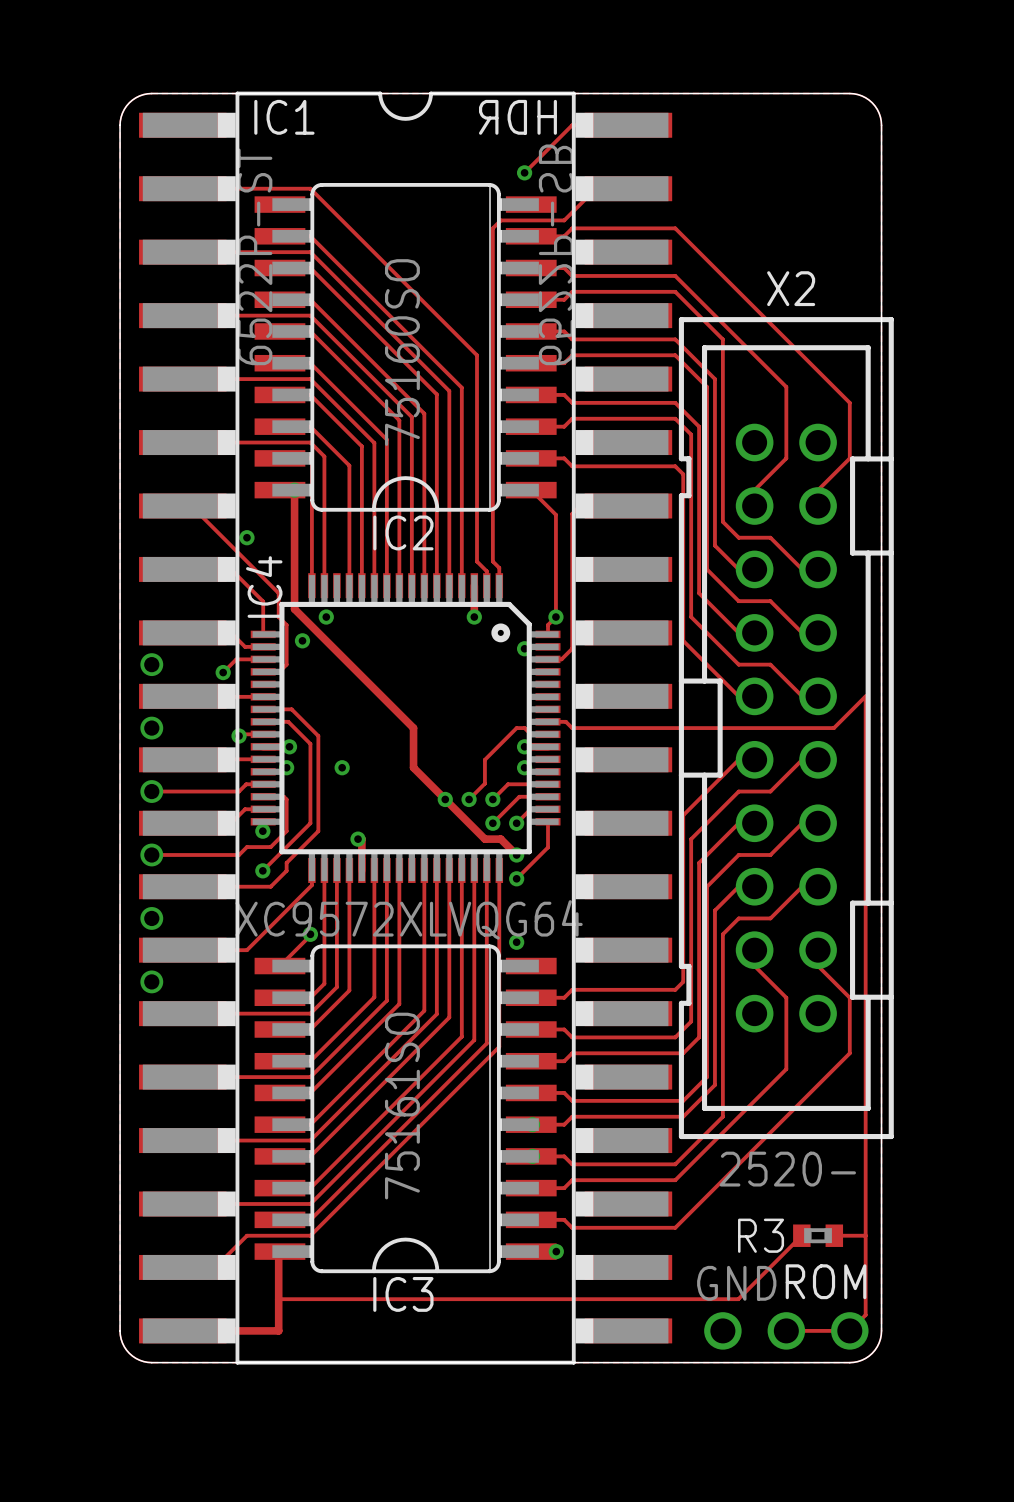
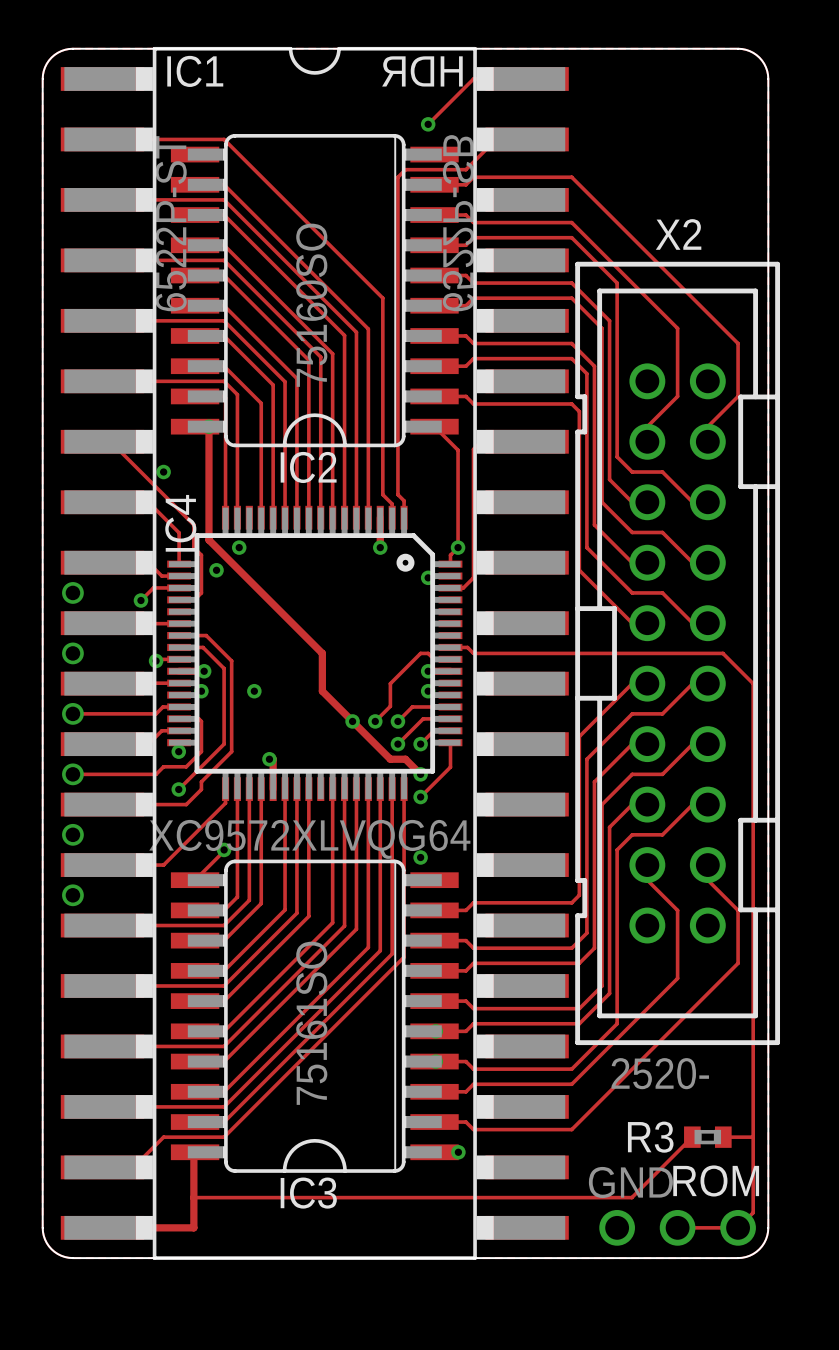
track: (833, 728) (865, 696) (865, 759) -> (722, 653) (753, 683)

